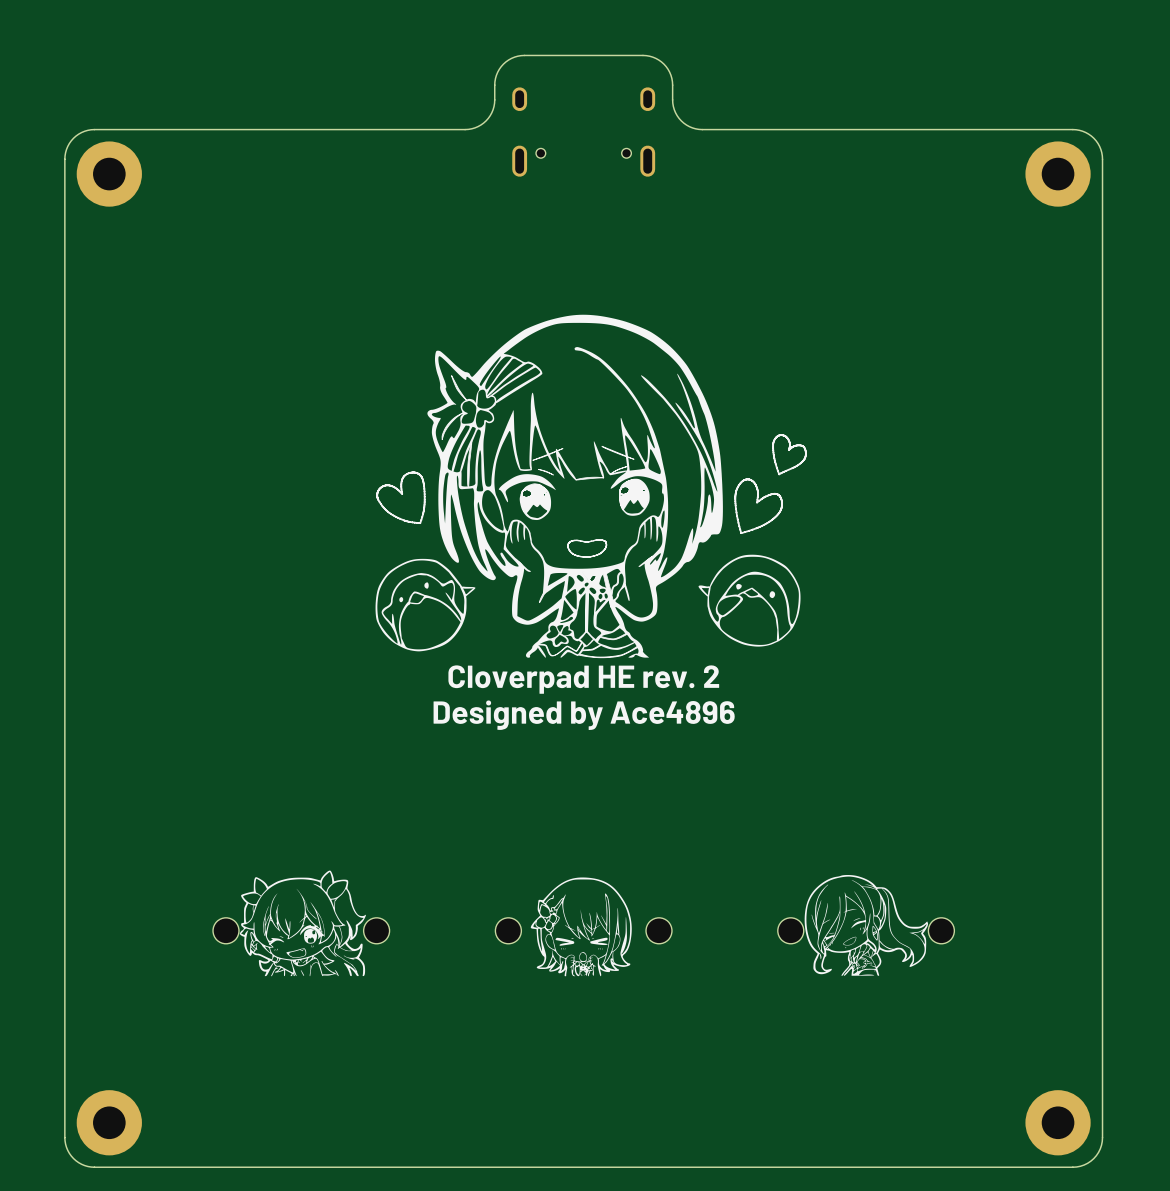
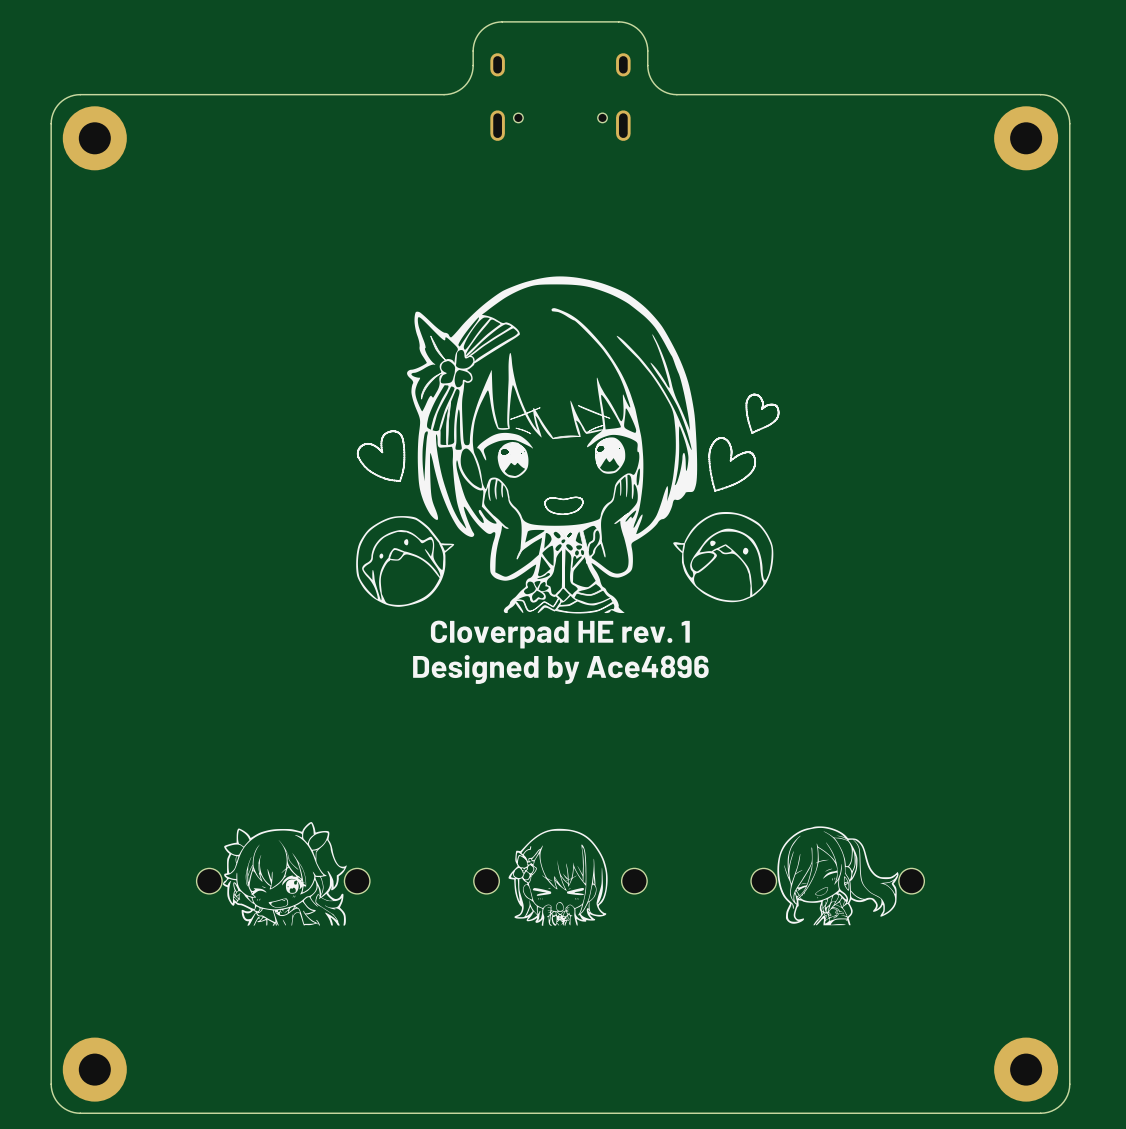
text: Cloverpad HE rev. 2 (583, 679) -> Cloverpad HE rev. 1 (560, 634)

